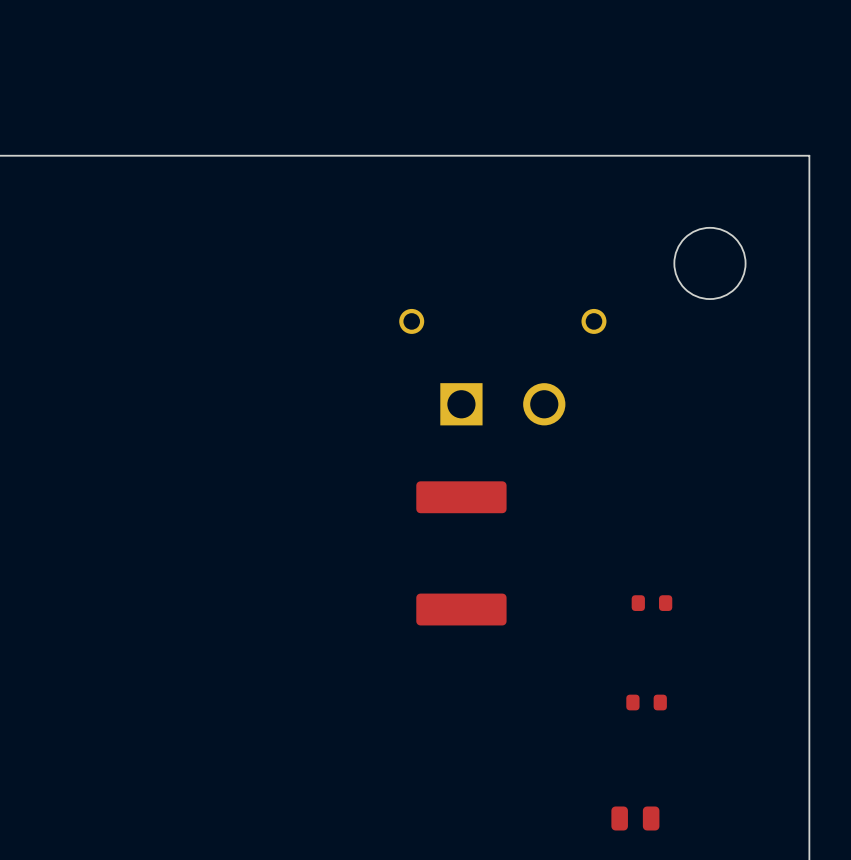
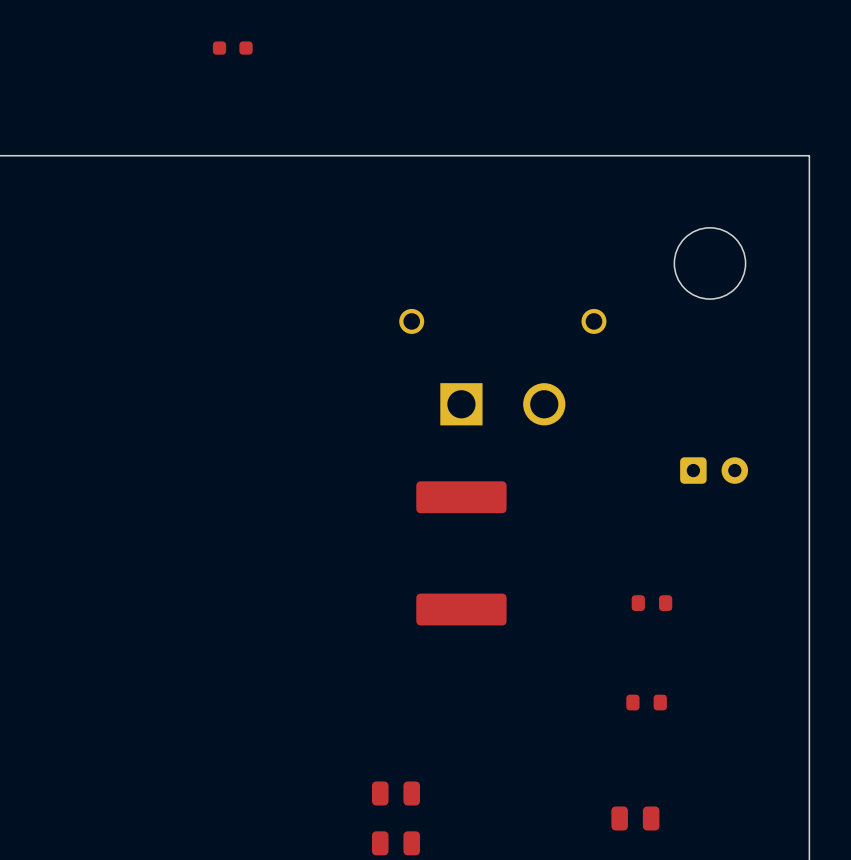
part: none -> (232, 48)
part: none -> (714, 470)
part: none -> (395, 793)
part: none -> (395, 843)

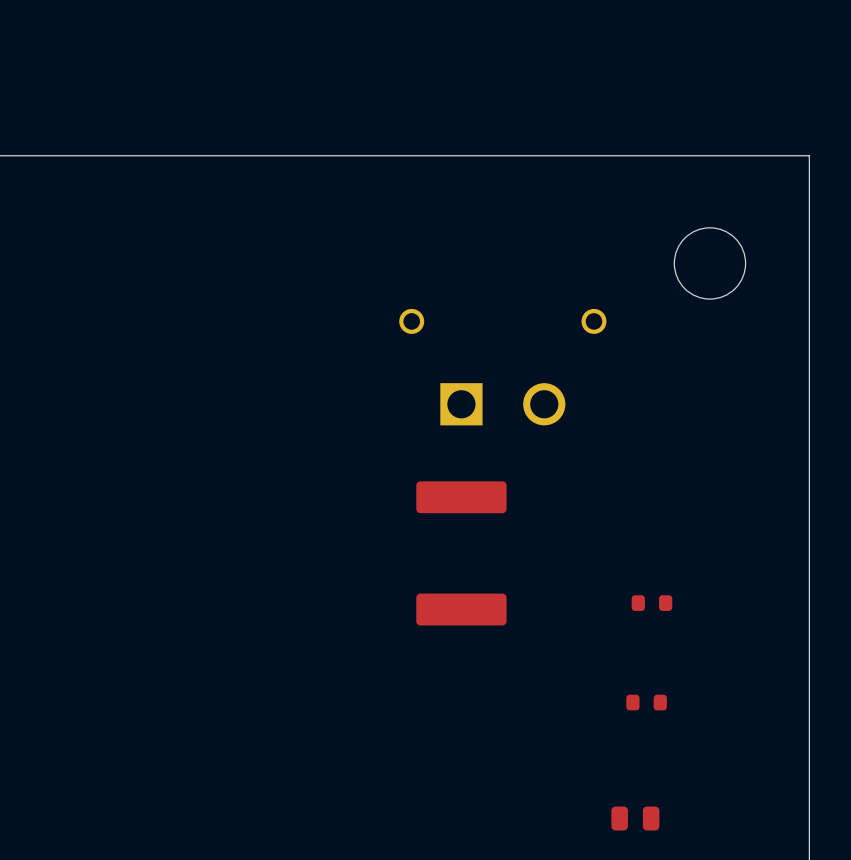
part: (232, 48) -> none
part: (714, 470) -> none
part: (395, 793) -> none
part: (395, 843) -> none

